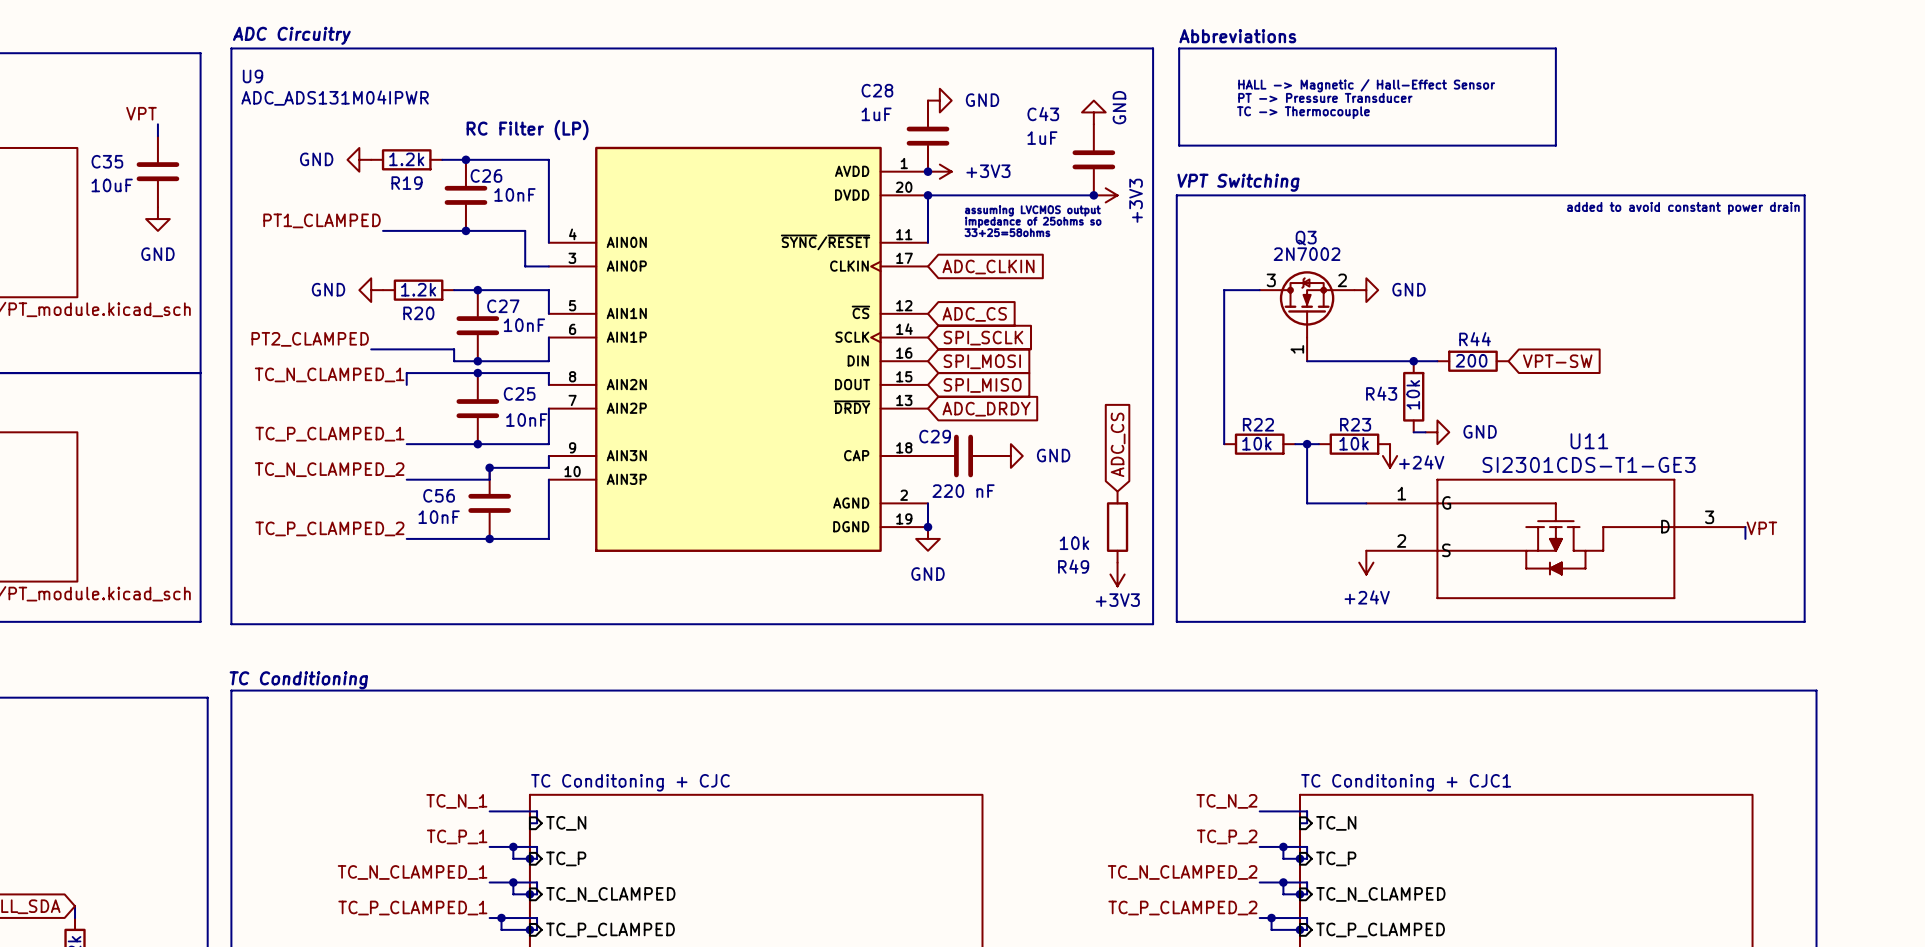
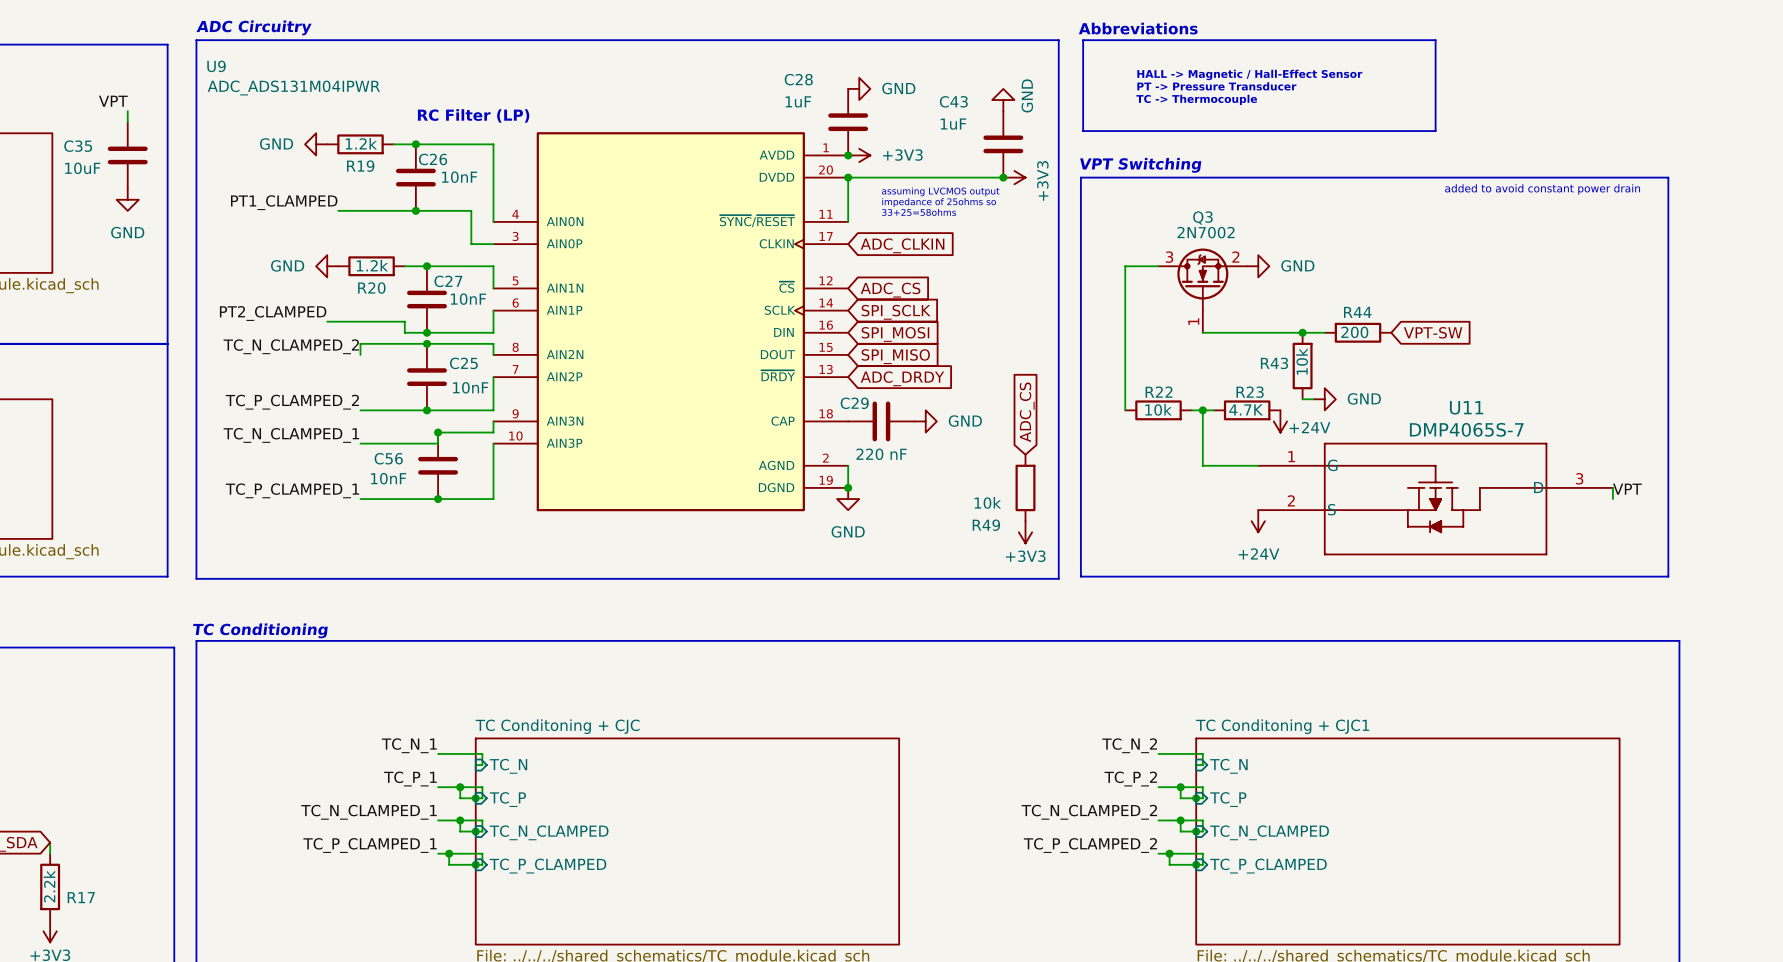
label: TC_N_CLAMPED_1 (329, 374) -> TC_N_CLAMPED_2 (291, 346)
label: TC_P_CLAMPED_1 (329, 434) -> TC_P_CLAMPED_2 (292, 402)
R23 value: 10k (1354, 443) -> 4.7K (1246, 409)
U11 value: SI2301CDS-T1-GE3 (1589, 464) -> DMP4065S-7 (1466, 429)
label: TC_N_CLAMPED_2 (329, 469) -> TC_N_CLAMPED_1 (291, 435)
label: TC_P_CLAMPED_2 (329, 528) -> TC_P_CLAMPED_1 (292, 490)

